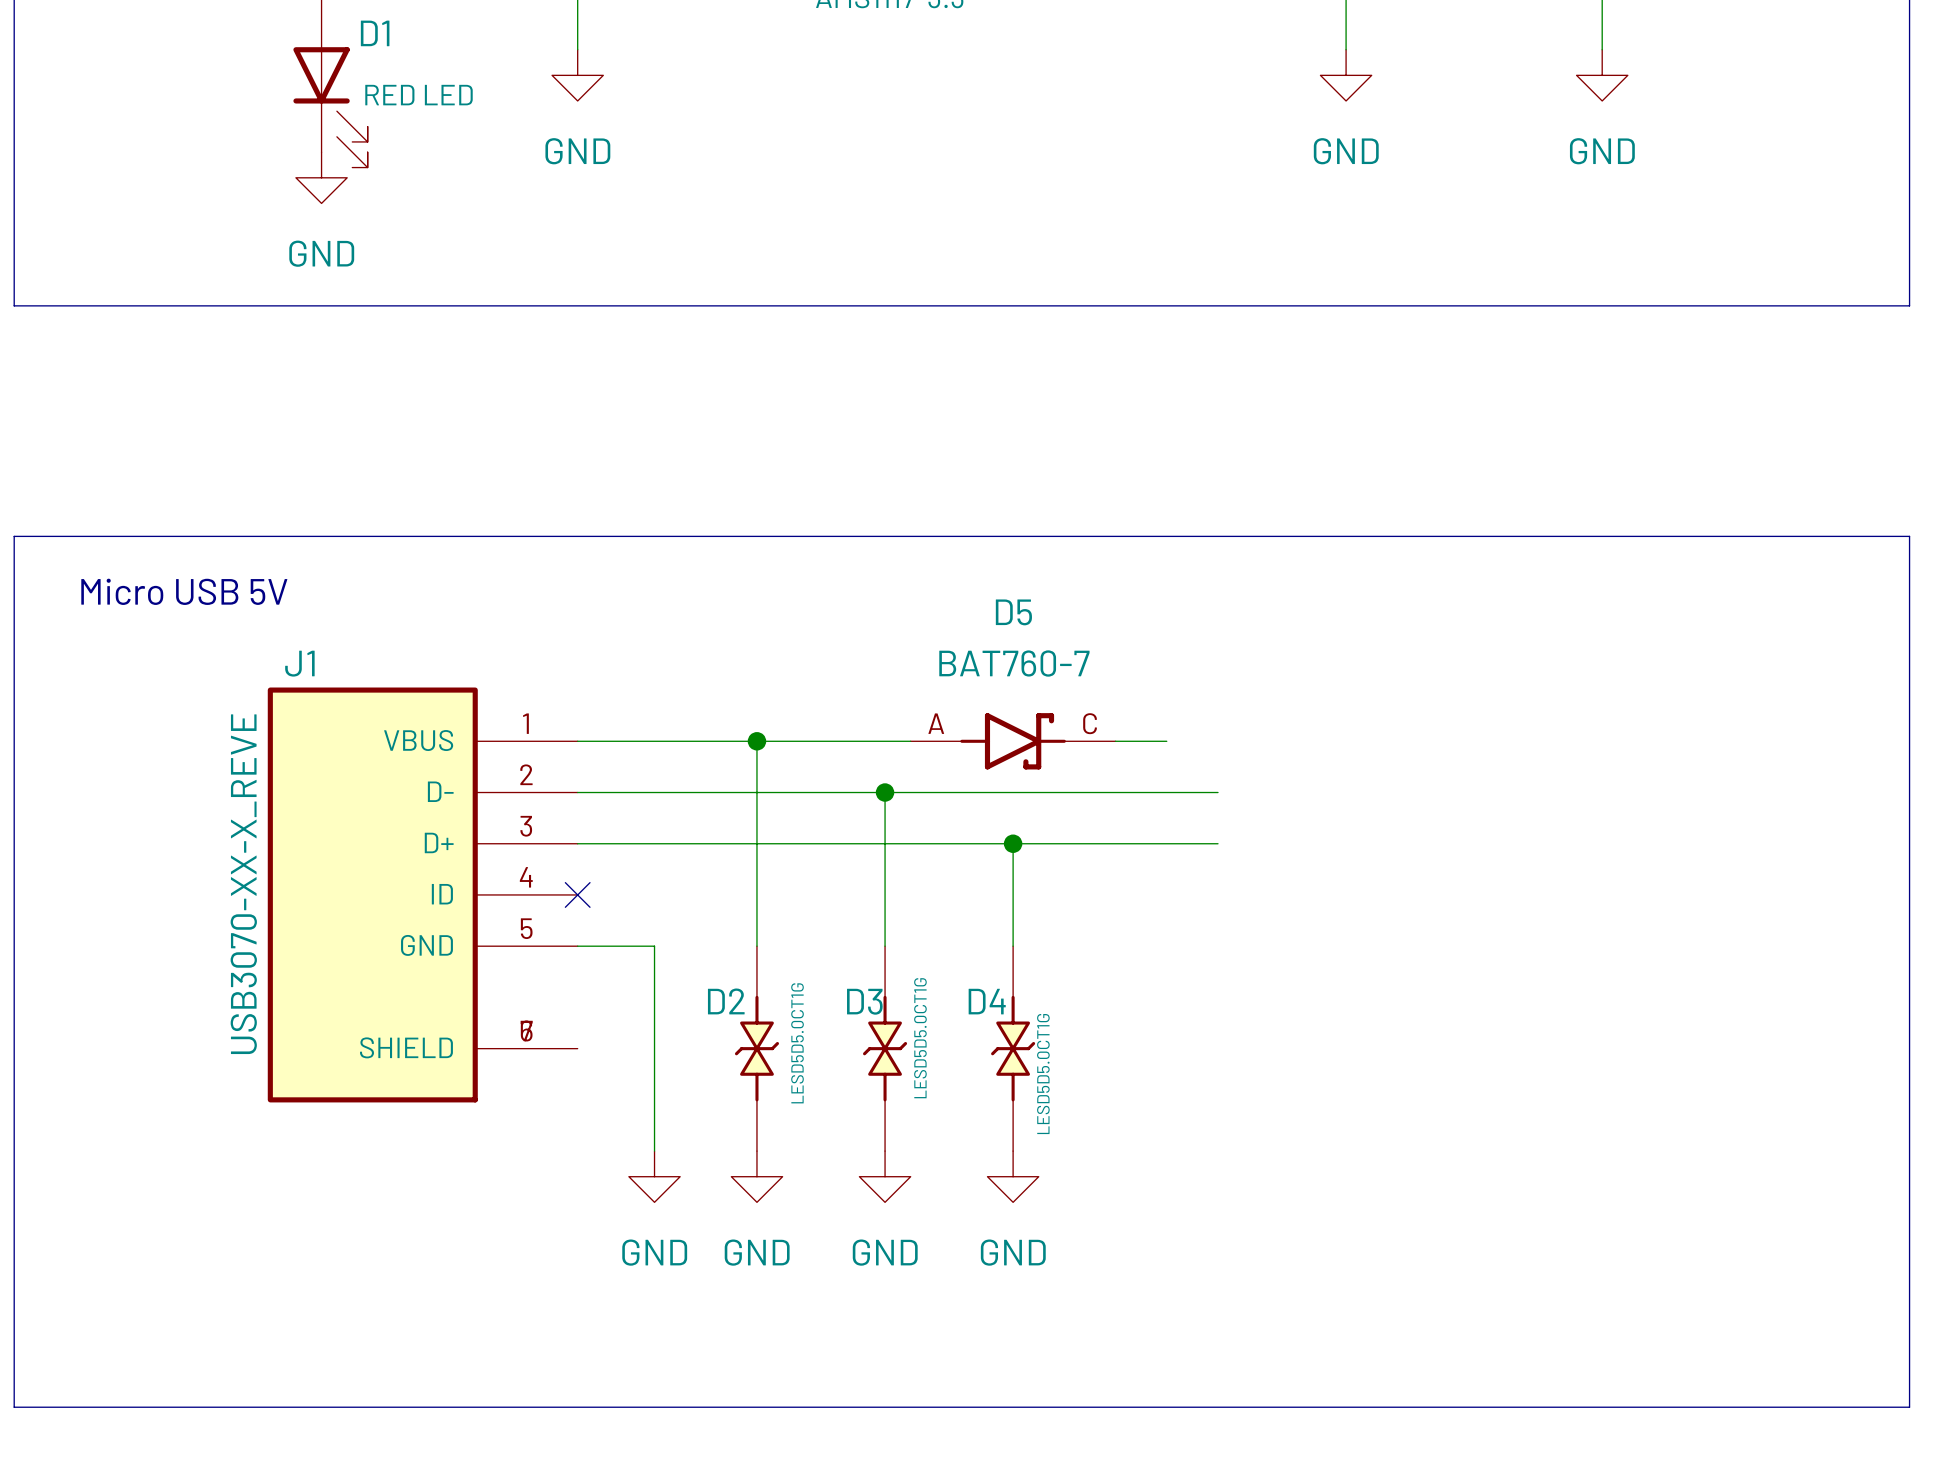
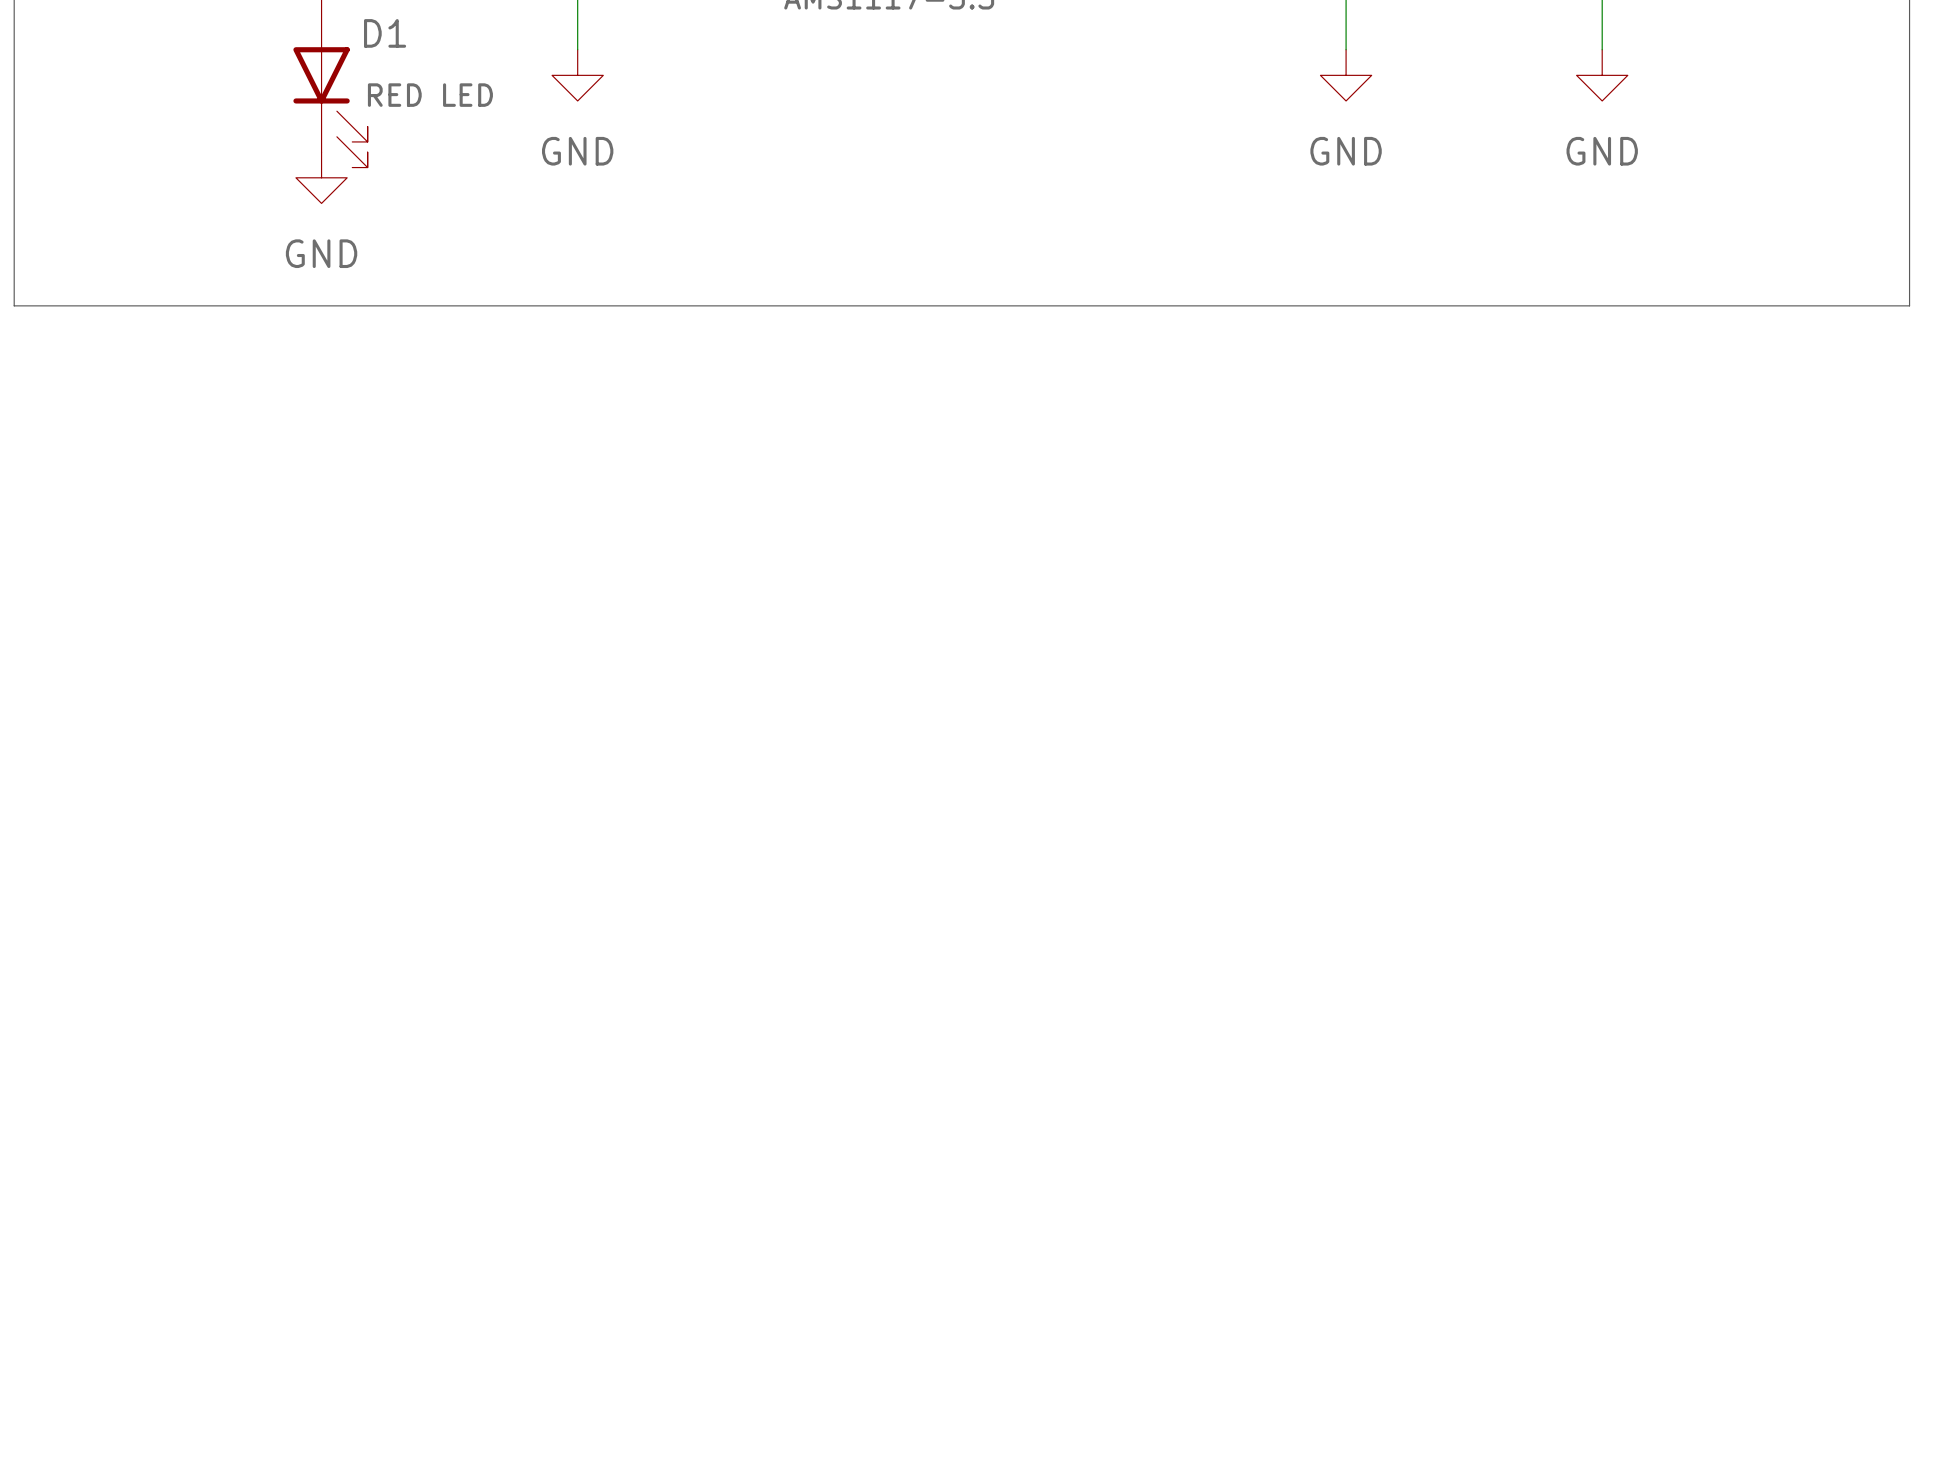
line: (14, 536) (1909, 536) (1909, 1407) (14, 1407) (14, 536) -> none
text: Micro USB 5V (184, 591) -> none
wire: (577, 741) (910, 741) -> none
wire: (756, 741) (756, 946) -> none
junction: (756, 741) -> none
D5: BAT760-7 (1013, 741) -> none
wire: (1115, 741) (1166, 741) -> none
wire: (577, 792) (1218, 792) -> none
wire: (885, 792) (885, 946) -> none
junction: (885, 792) -> none
wire: (577, 843) (1218, 843) -> none
wire: (1013, 843) (1013, 946) -> none
junction: (1013, 843) -> none
J1: USB3070-XX-X_REVE (422, 894) -> none
no-connect mark: (577, 894) -> none
wire: (577, 946) (654, 946) (654, 1151) -> none
D2: LESD5D5.0CT1G (756, 1048) -> none
D3: LESD5D5.0CT1G (885, 1048) -> none
D4: LESD5D5.0CT1G (1013, 1048) -> none
power symbol: GND (654, 1176) -> none
power symbol: GND (756, 1176) -> none
power symbol: GND (885, 1176) -> none
power symbol: GND (1013, 1176) -> none

